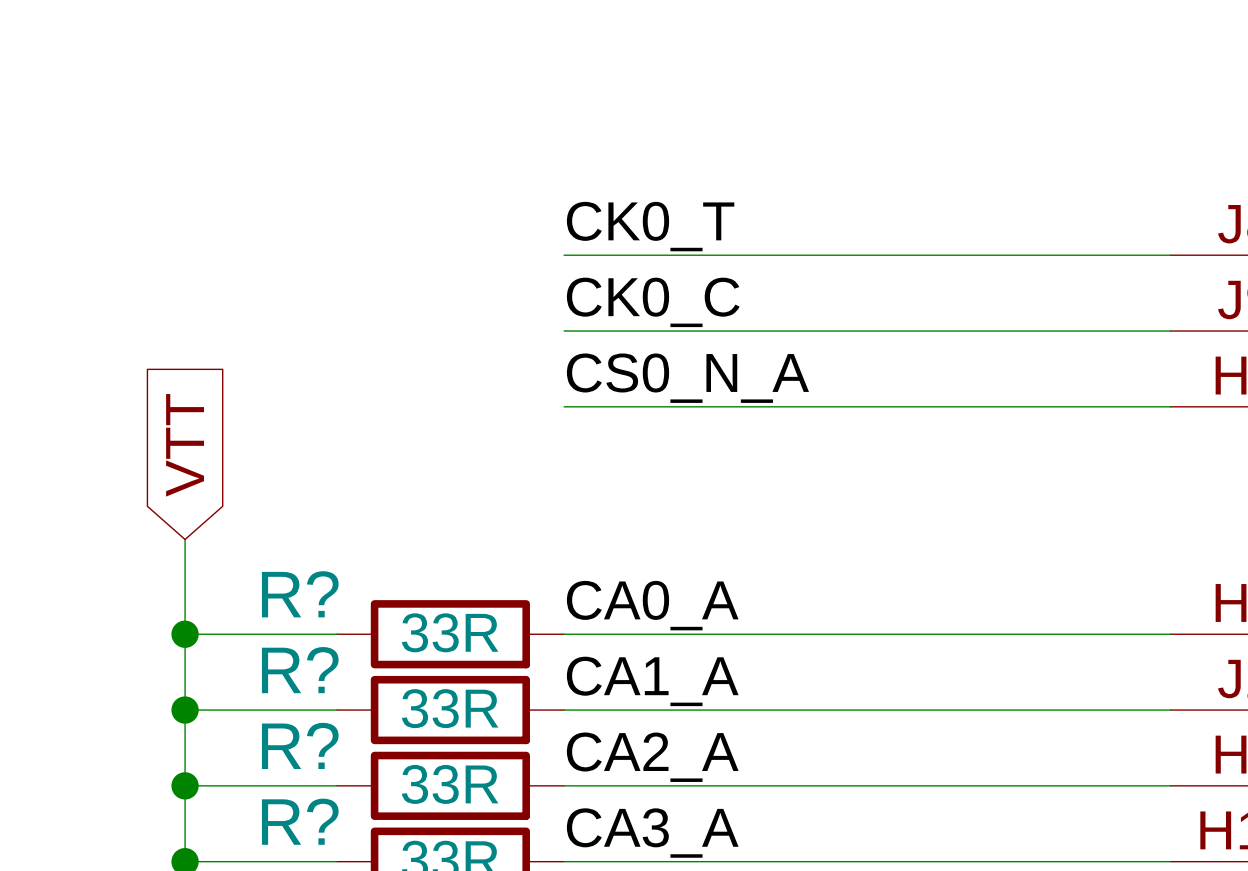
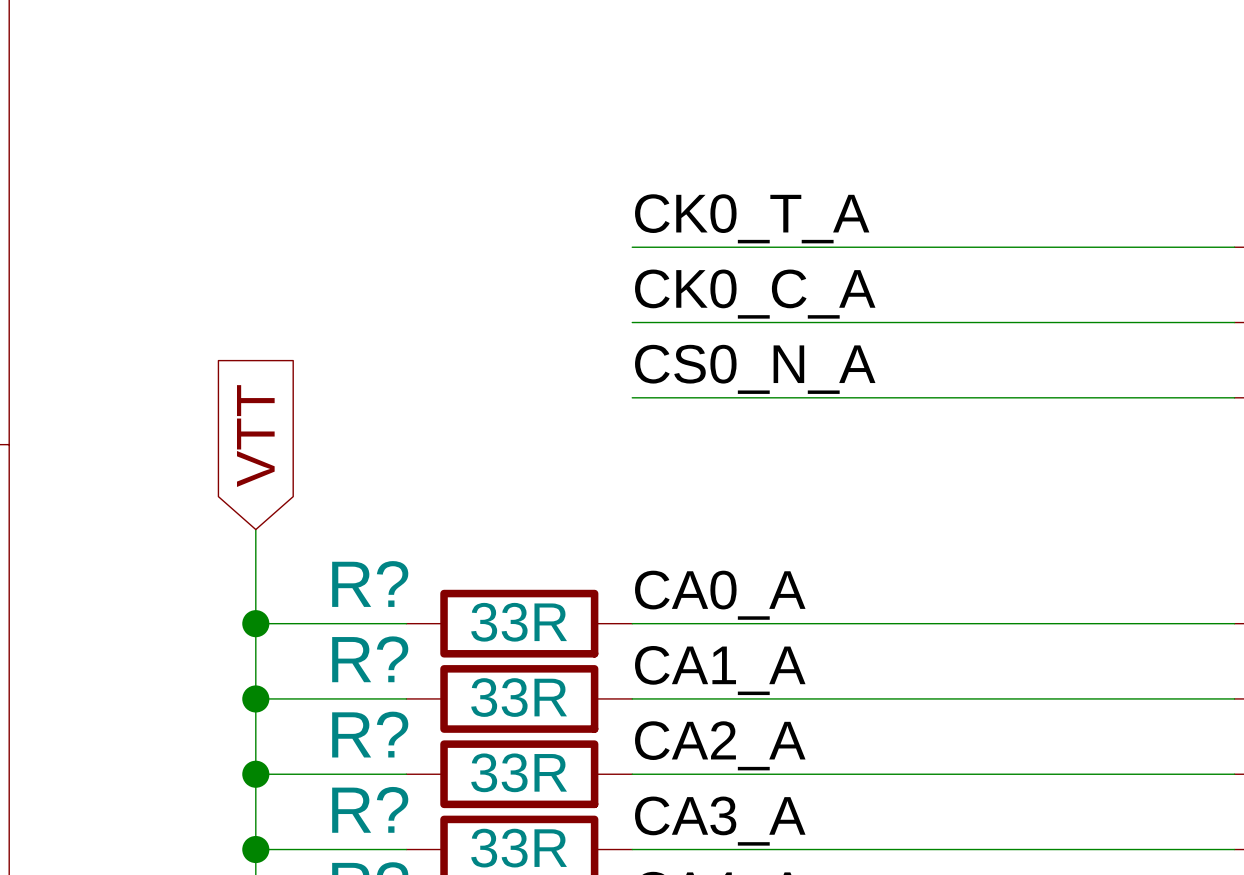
label: CK0_T (650, 226) -> CK0_T_A (752, 218)
label: CK0_C (653, 302) -> CK0_C_A (755, 294)

